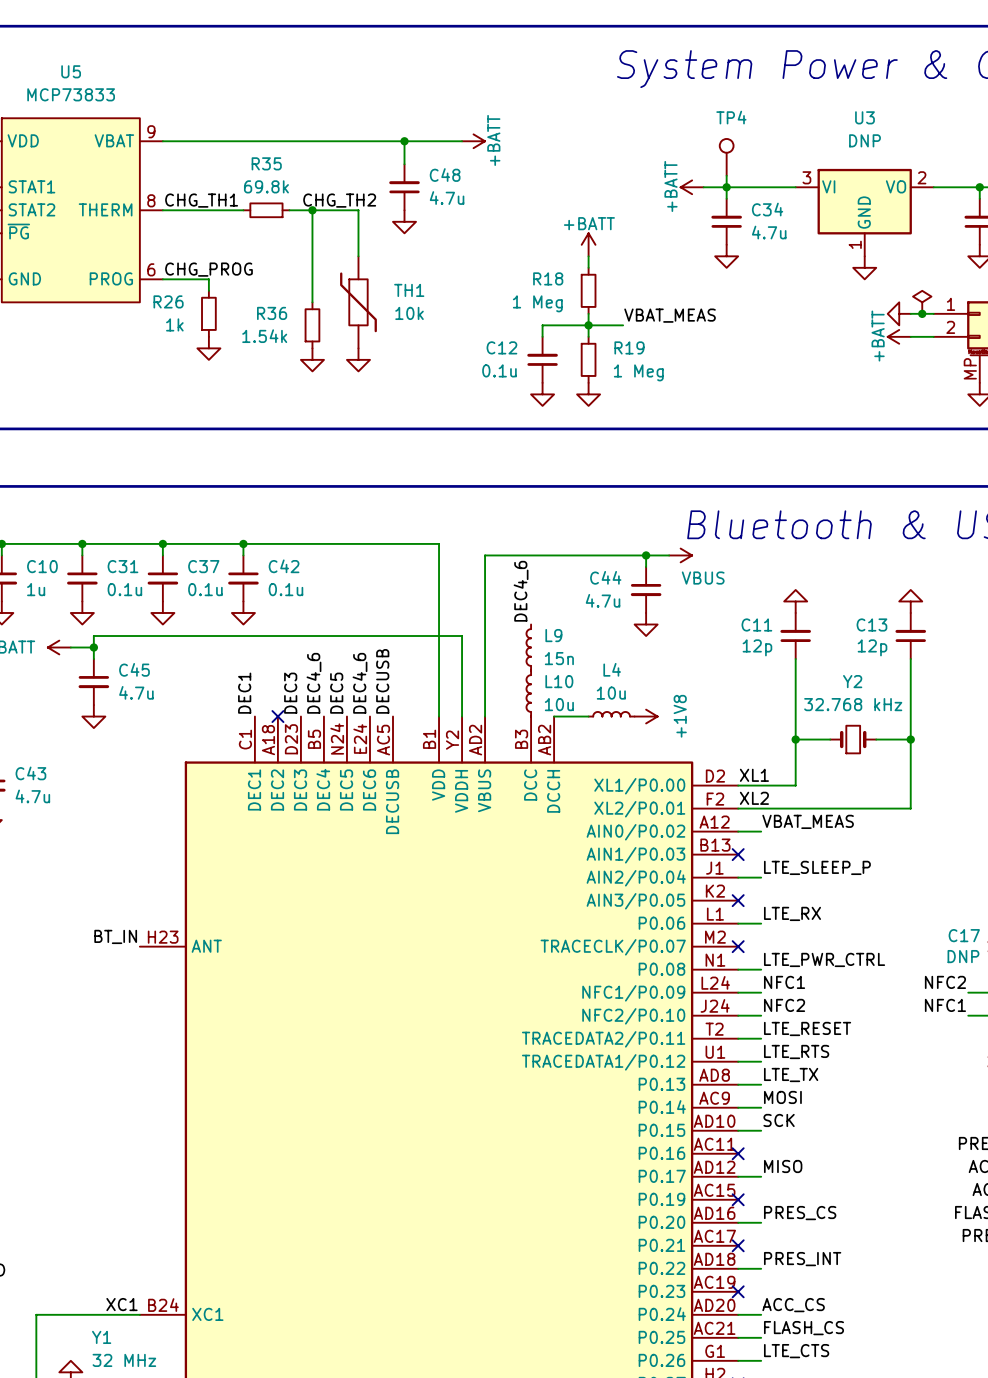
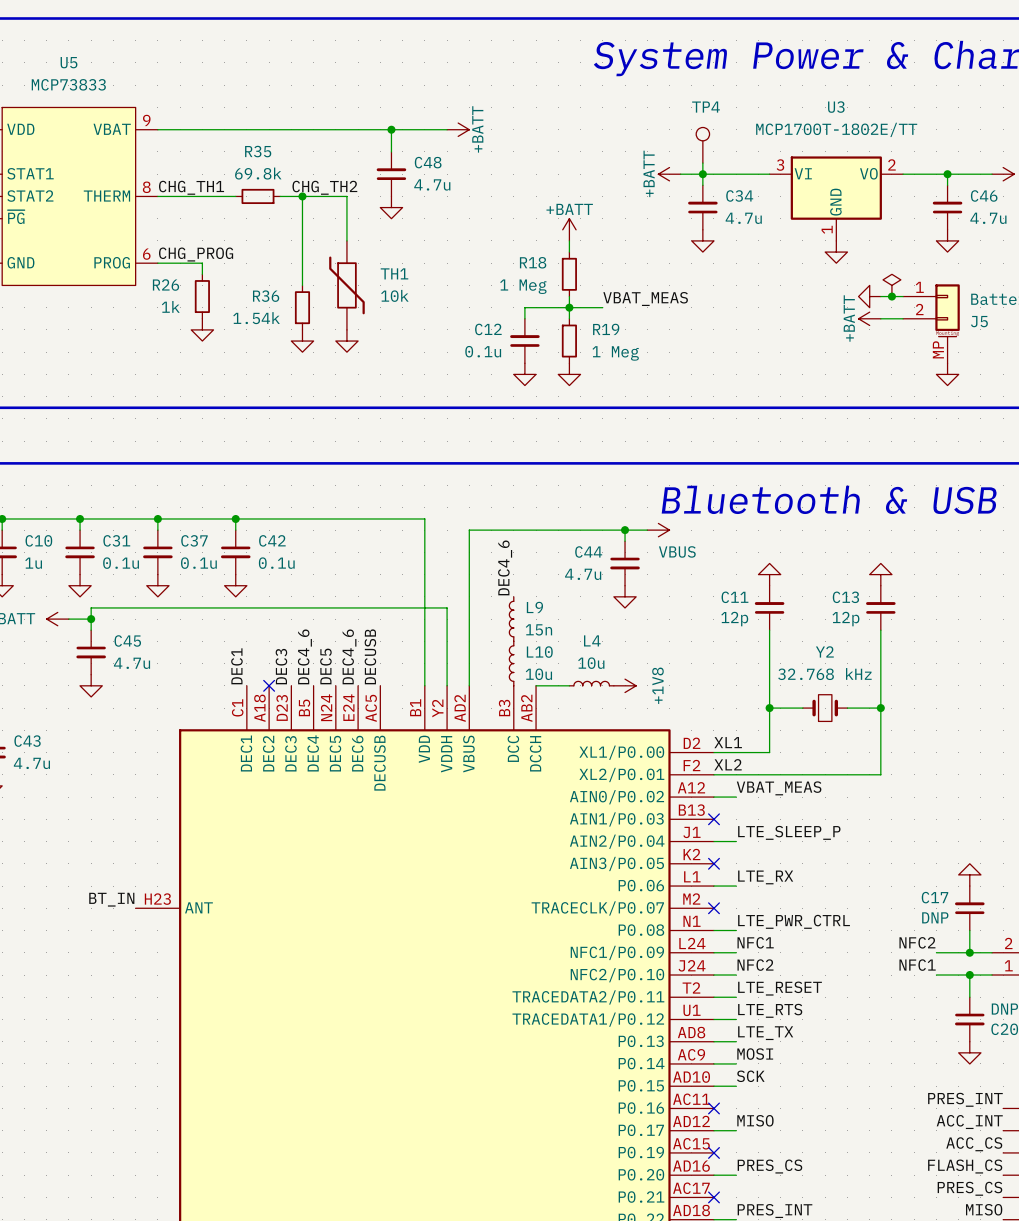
U3 value: DNP (864, 140) -> MCP1700T-1802E/TT (836, 129)

